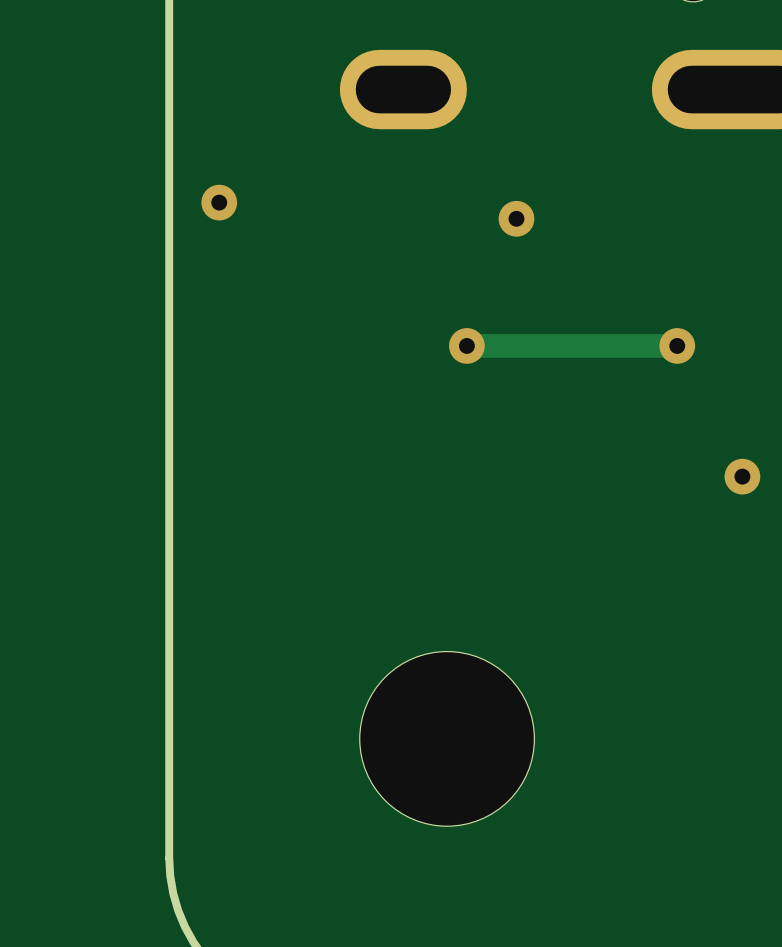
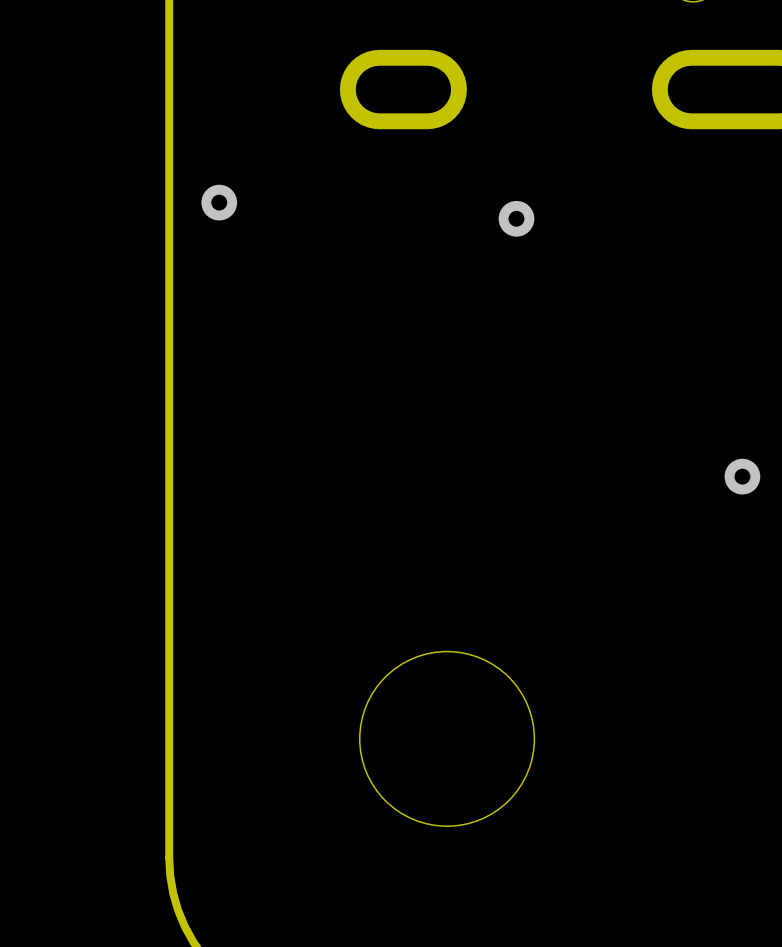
track: (466, 345) (677, 345) -> none
via: (466, 345) -> none
via: (677, 345) -> none

